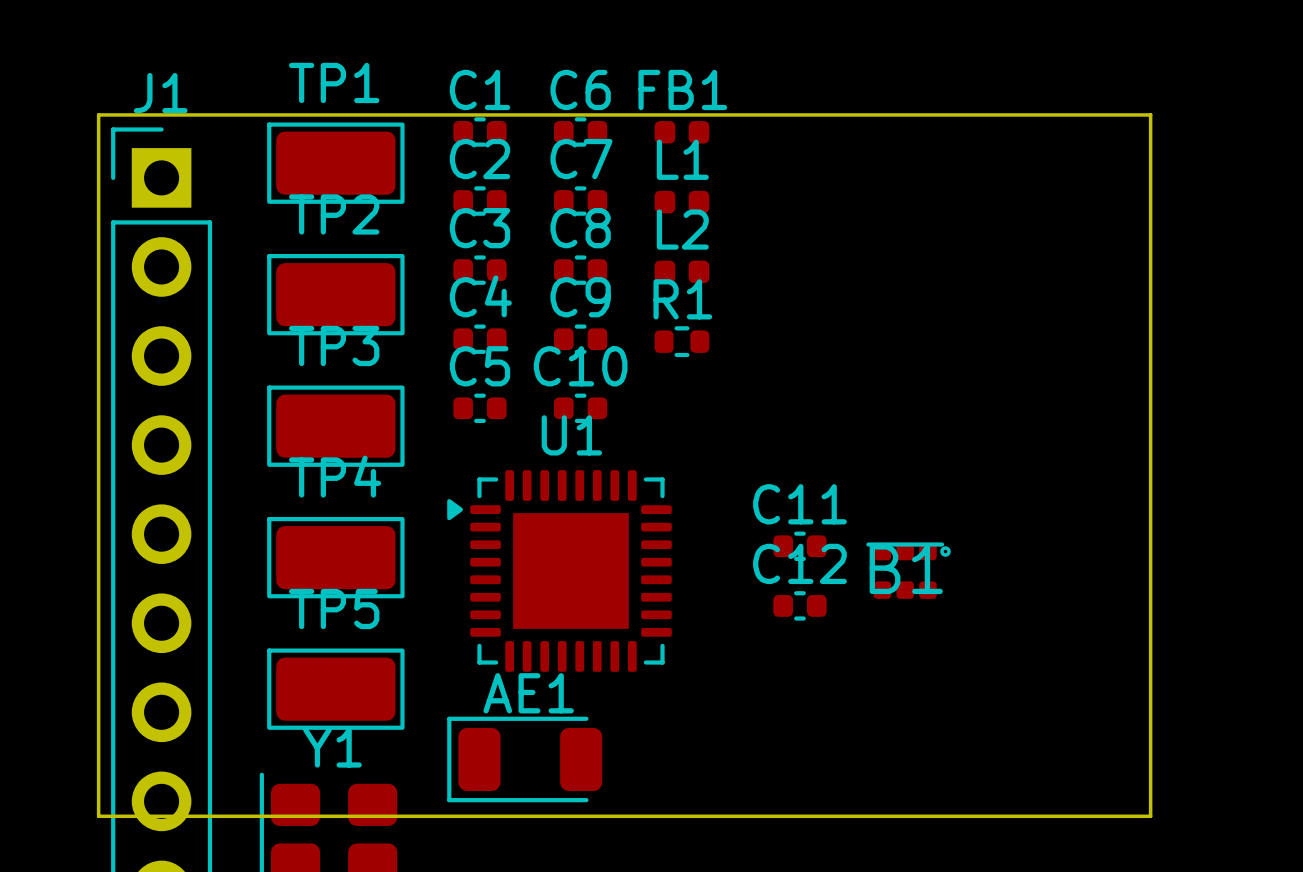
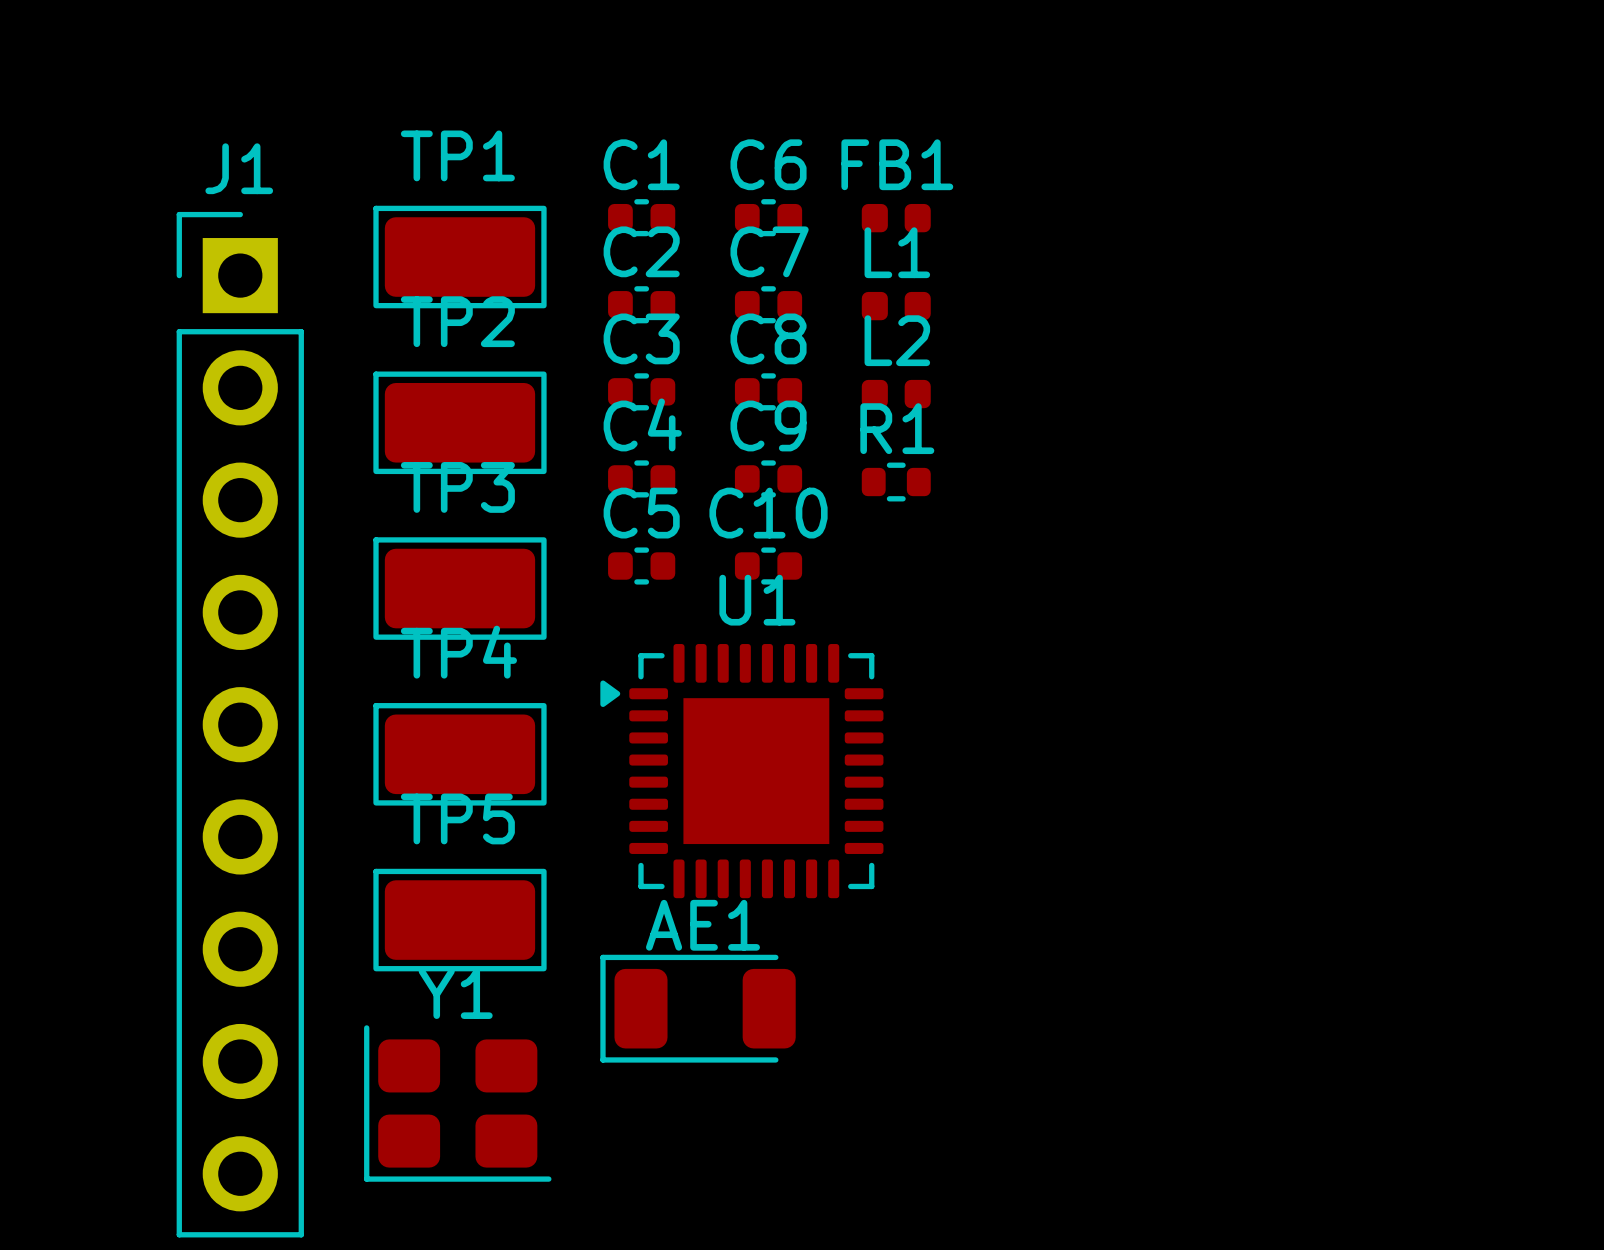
board edge: (98, 114) (1150, 114) (1150, 816) (98, 816) (98, 114) -> none
C11: (799, 546) -> none
B1: (908, 570) -> none
C12: (799, 605) -> none

